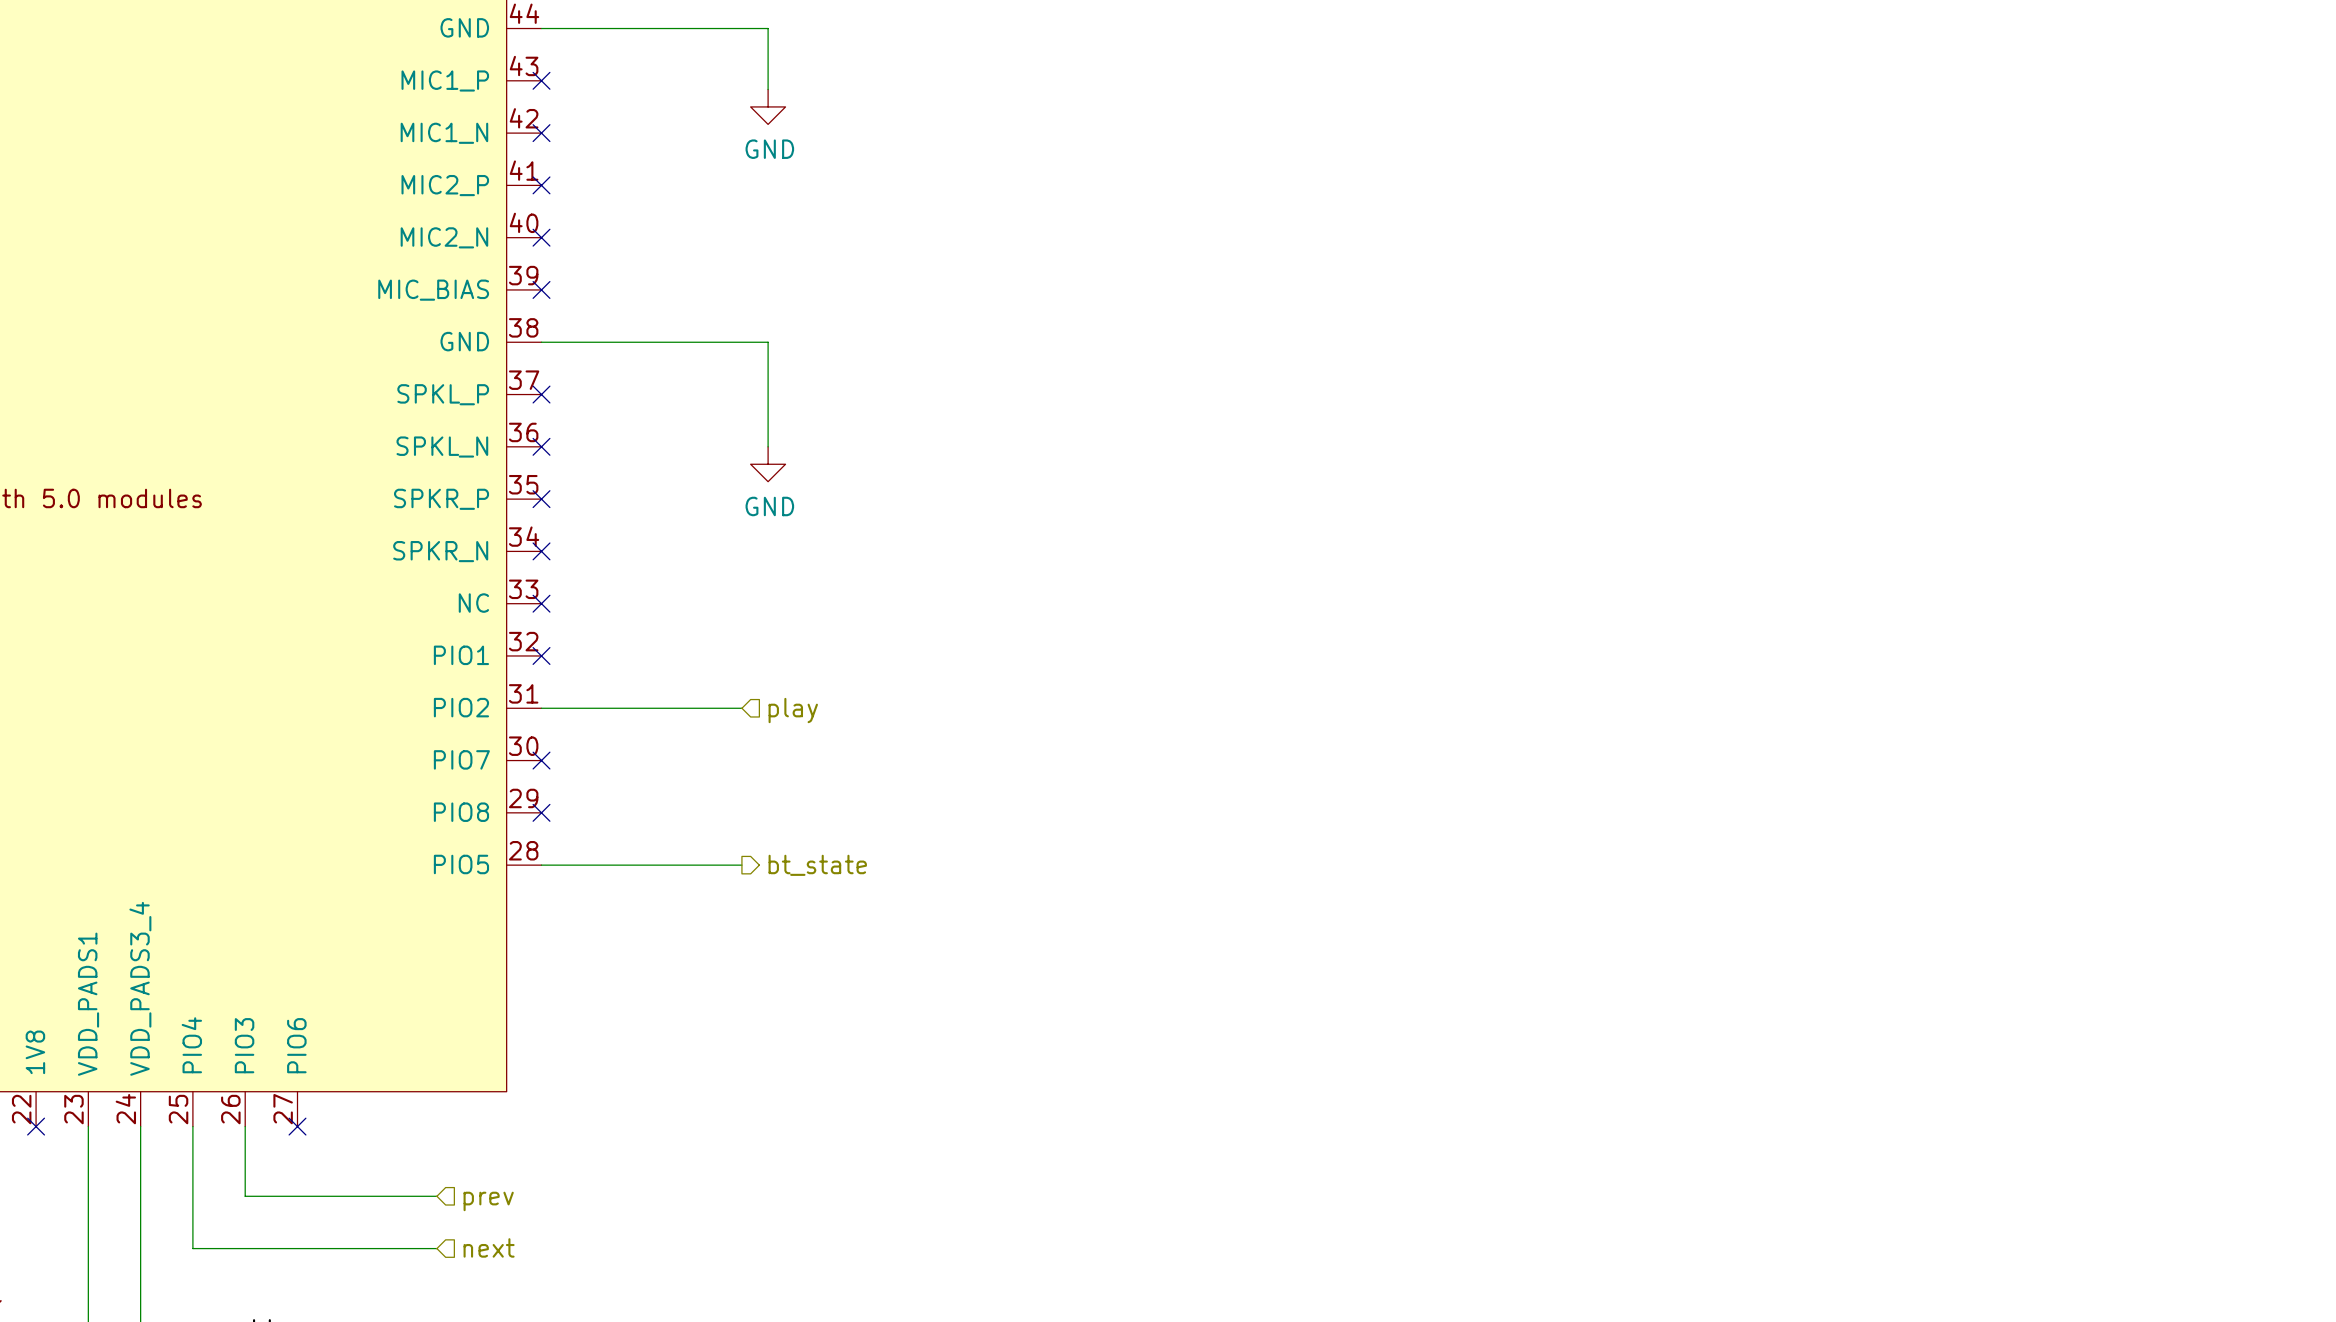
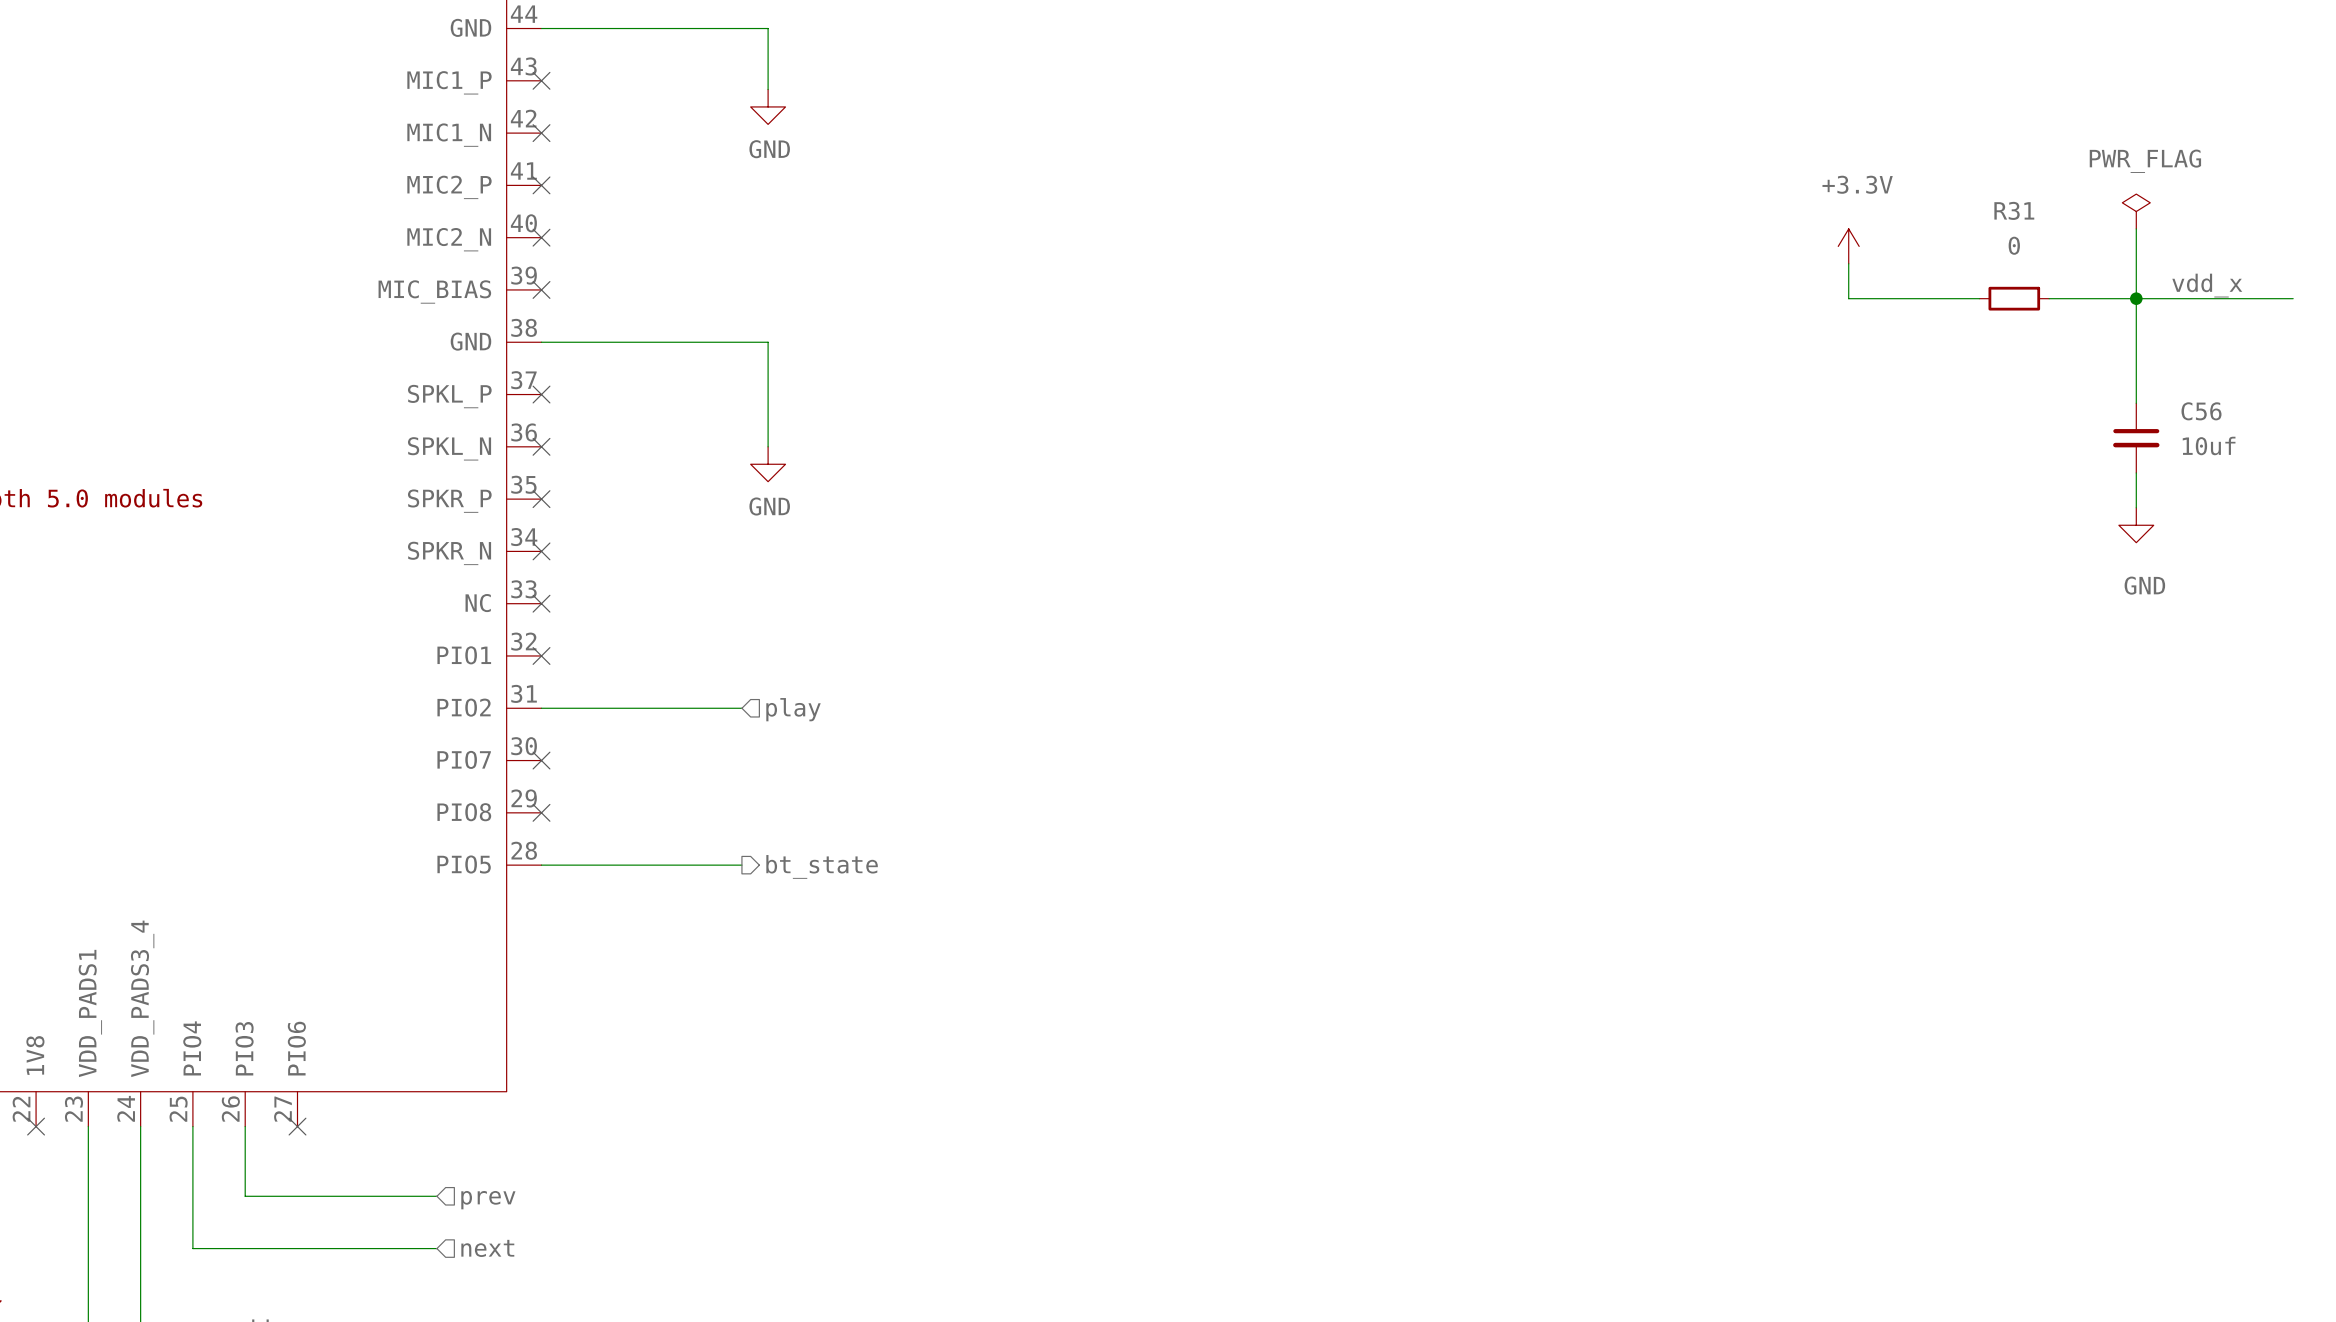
power symbol: none -> PWR_FLAG (2136, 211)
wire: none -> (2136, 228) (2136, 403)
power symbol: none -> +3.3V (1848, 246)
wire: none -> (1848, 263) (1848, 298) (1979, 298)
label: none -> vdd_x (2207, 285)
R31: none -> 0 (2014, 298)
wire: none -> (2049, 298) (2293, 298)
junction: none -> (2136, 298)
C56: none -> 10uf (2136, 438)
wire: none -> (2136, 472) (2136, 507)
power symbol: none -> GND (2136, 525)

